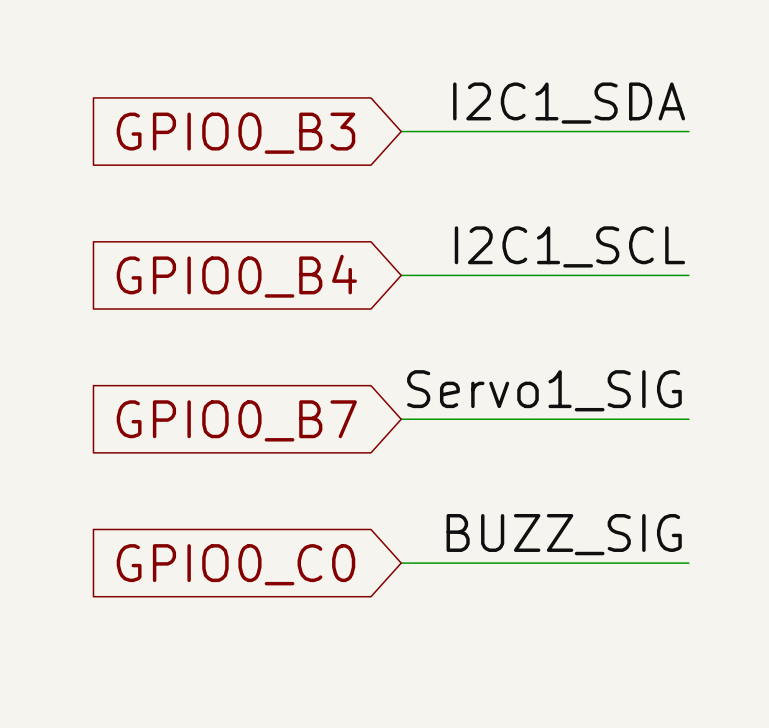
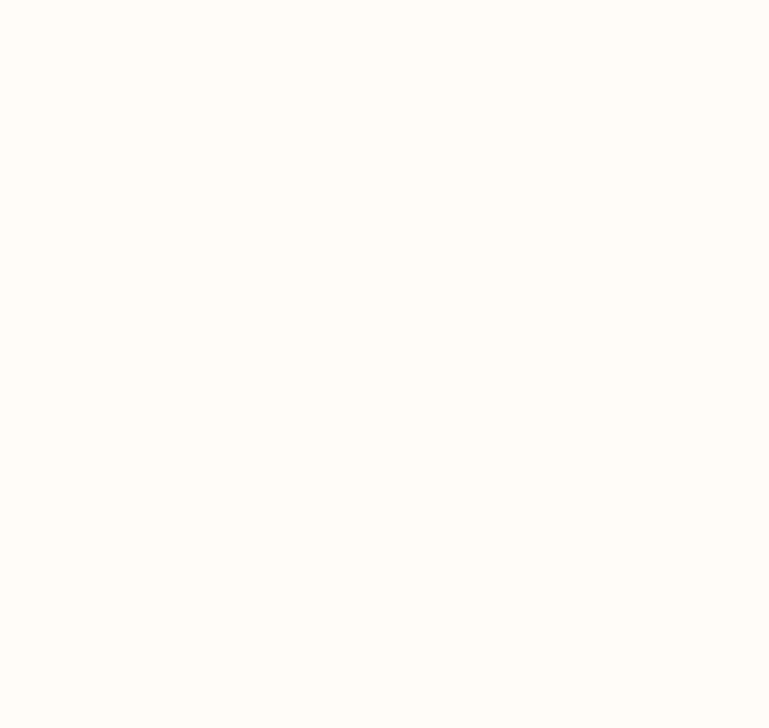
label: I2C1_SDA (569, 103) -> none
wire: (401, 131) (688, 131) -> none
global label: GPIO0_B3 (235, 133) -> none
label: I2C1_SCL (569, 246) -> none
wire: (401, 275) (688, 275) -> none
global label: GPIO0_B4 (236, 276) -> none
label: Servo1_SIG (544, 390) -> none
wire: (401, 419) (688, 419) -> none
global label: GPIO0_B7 (236, 420) -> none
label: BUZZ_SIG (564, 534) -> none
wire: (401, 563) (688, 563) -> none
global label: GPIO0_C0 (235, 564) -> none

